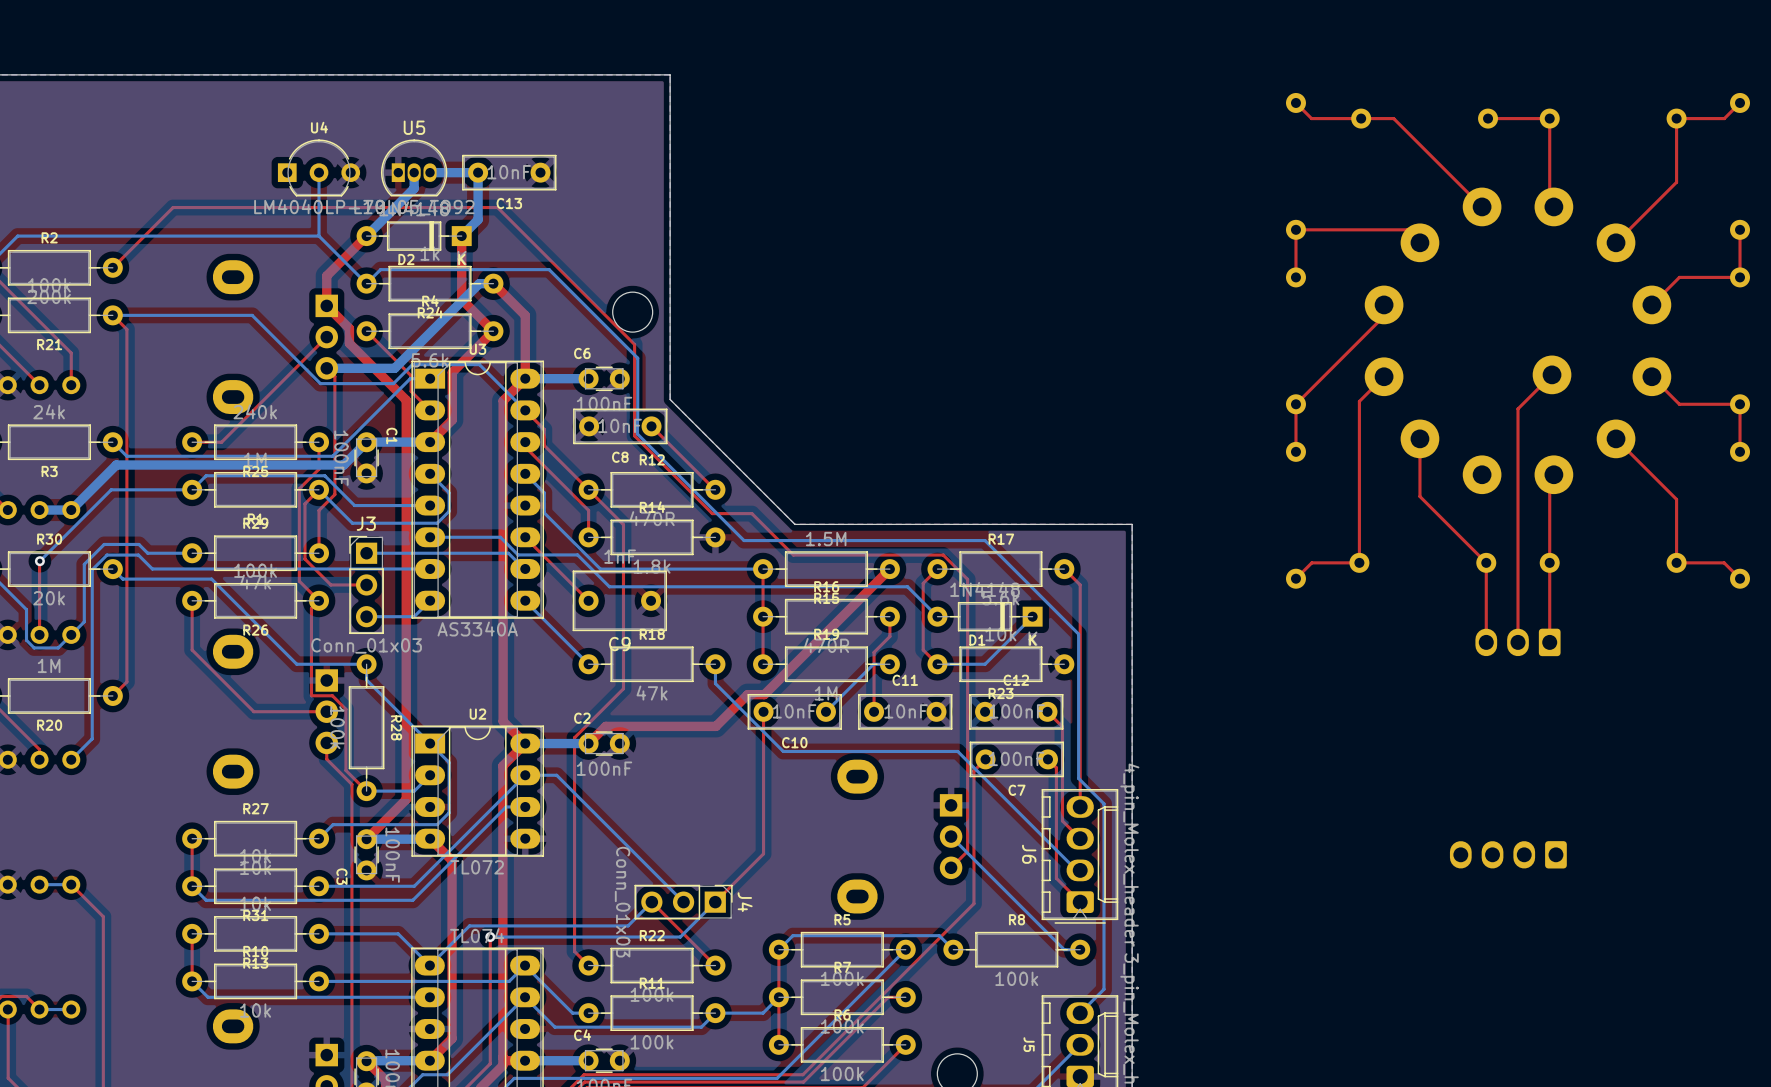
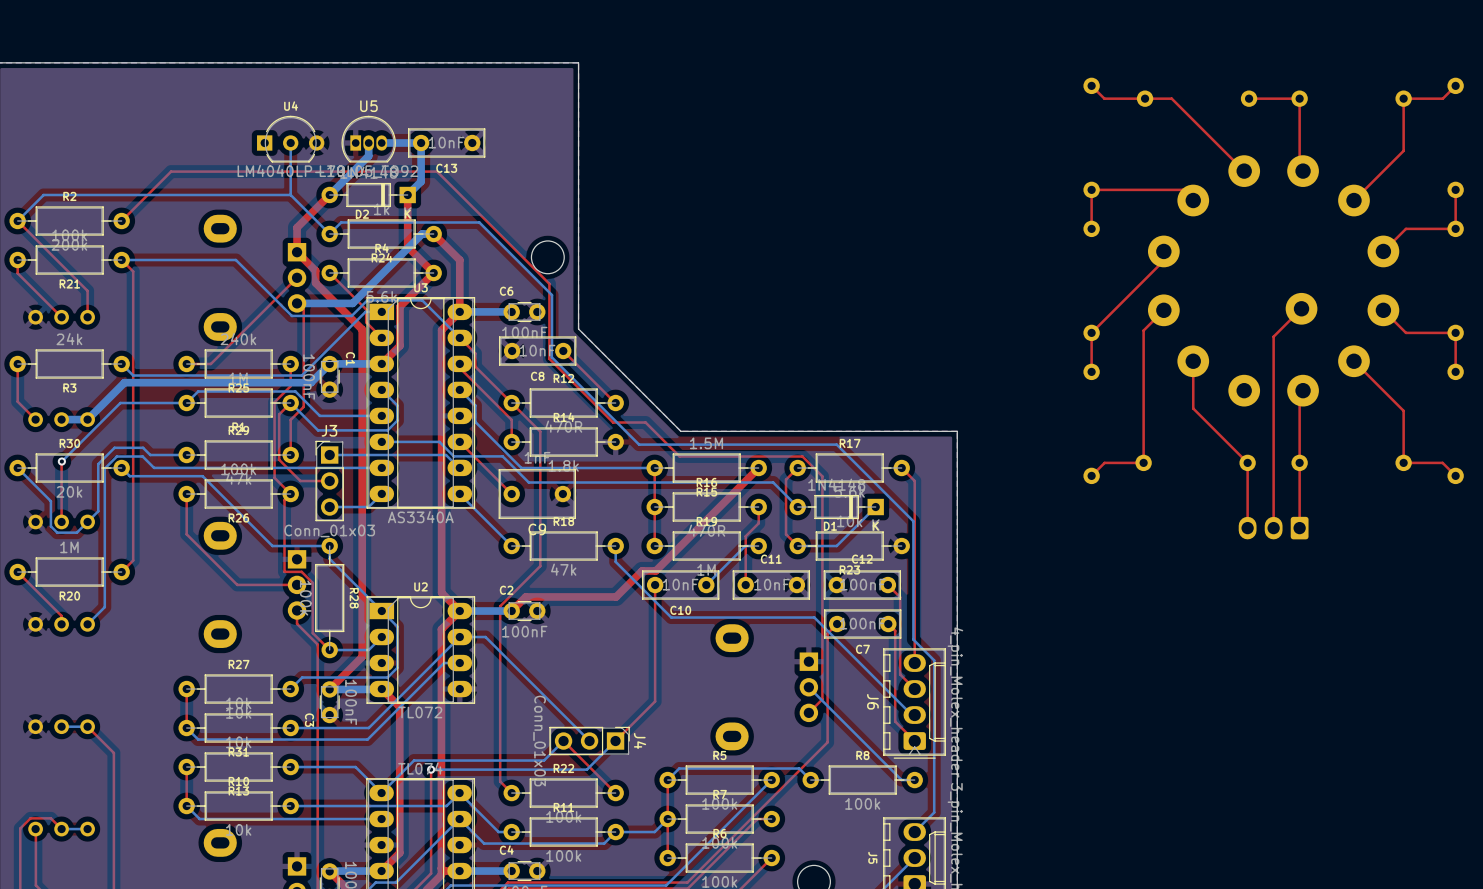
part: (1508, 854) -> none

